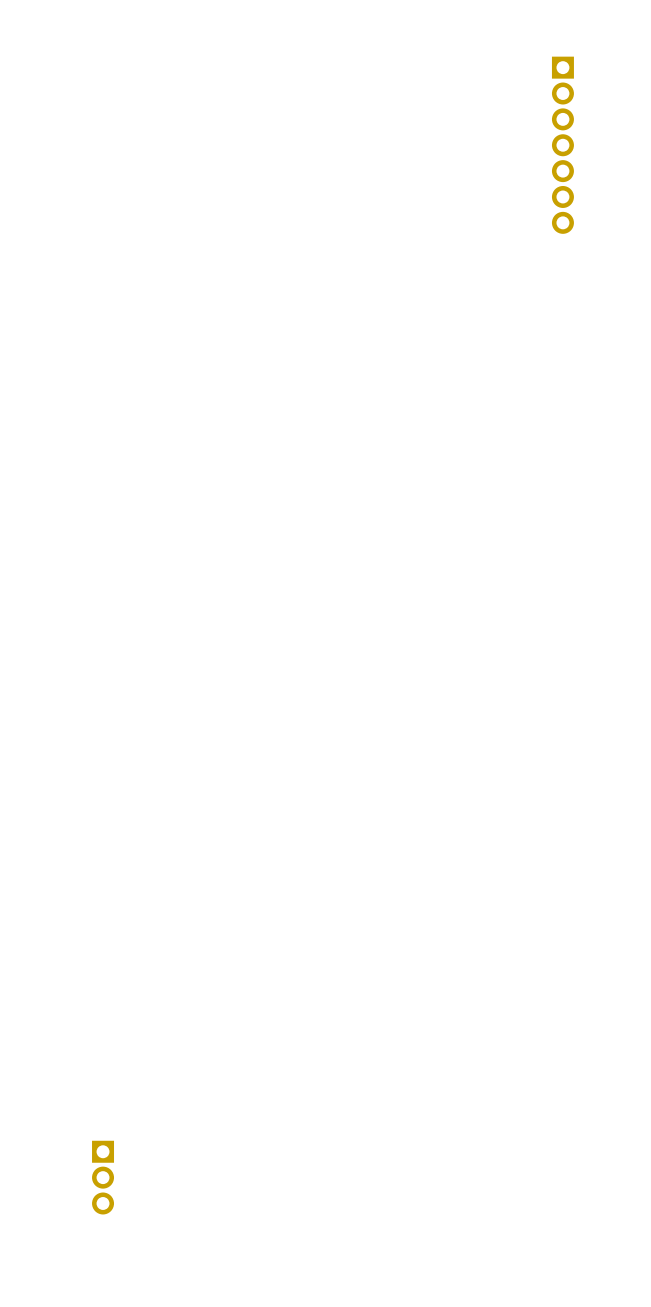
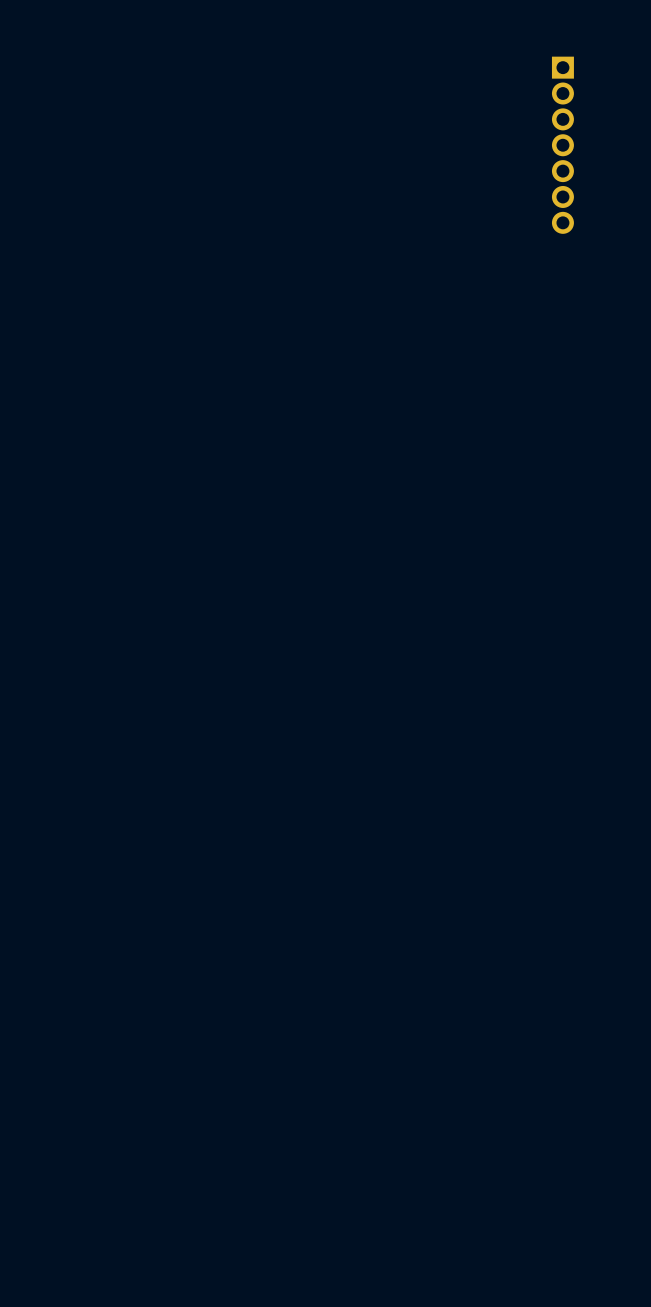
part: (103, 1177) -> none

